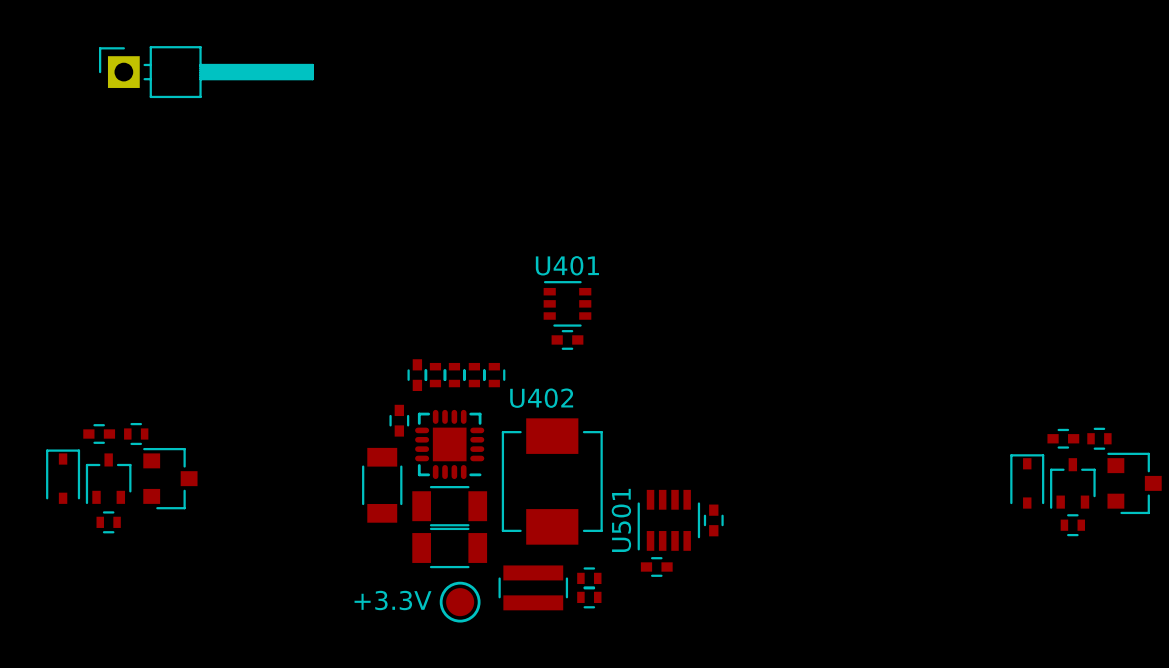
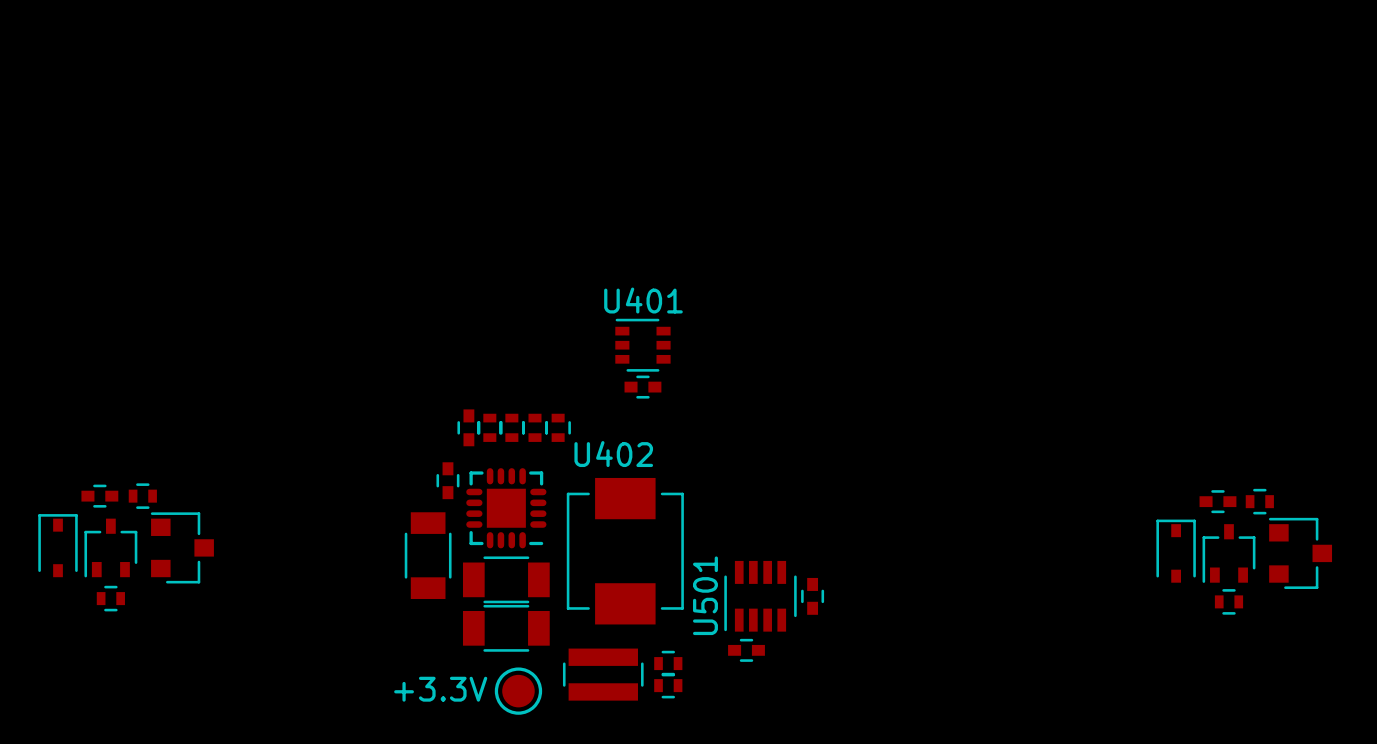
part: (206, 72) -> none

